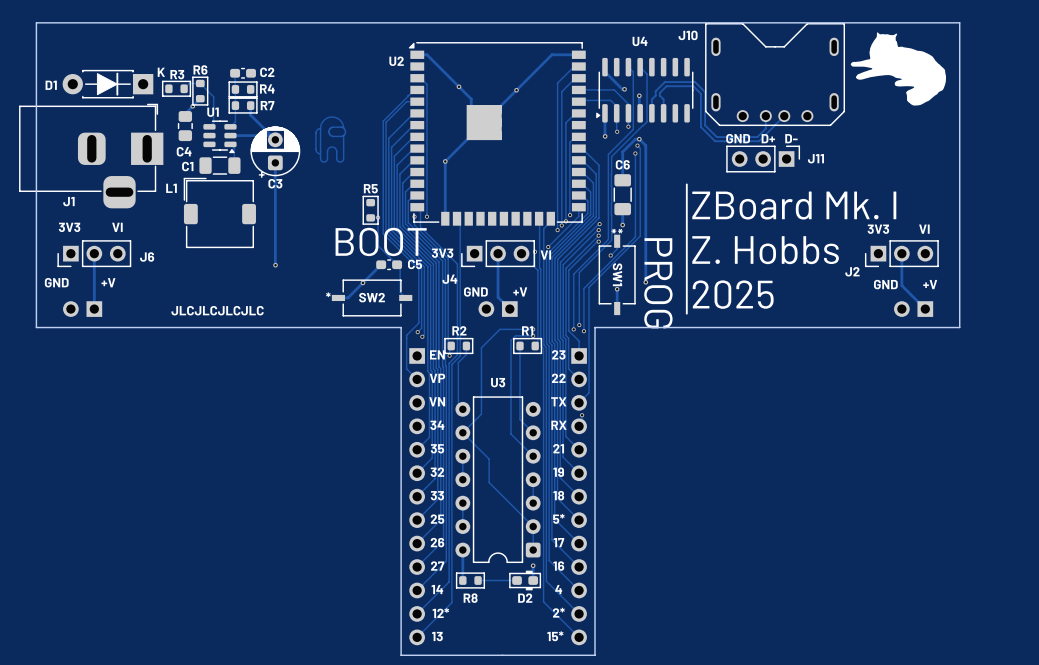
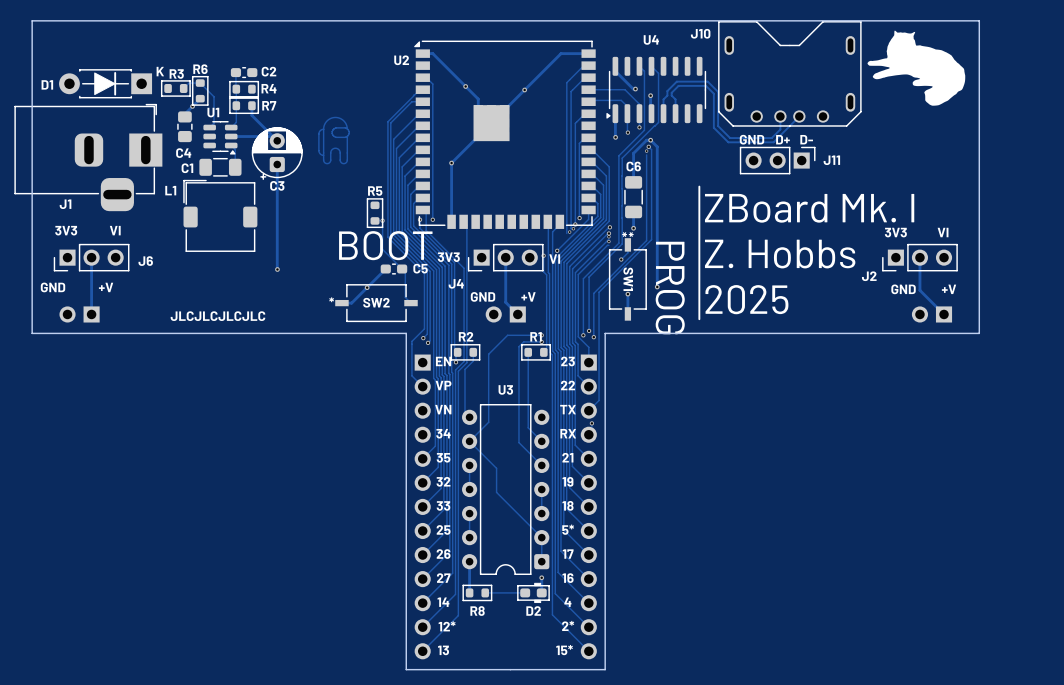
via: none -> (646, 151)
via: (635, 153) -> none
via: (561, 225) -> none
via: none -> (573, 228)
via: none -> (569, 232)
via: (557, 230) -> none
via: none -> (608, 236)
via: (598, 235) -> none
via: none -> (608, 241)
via: (598, 241) -> none

